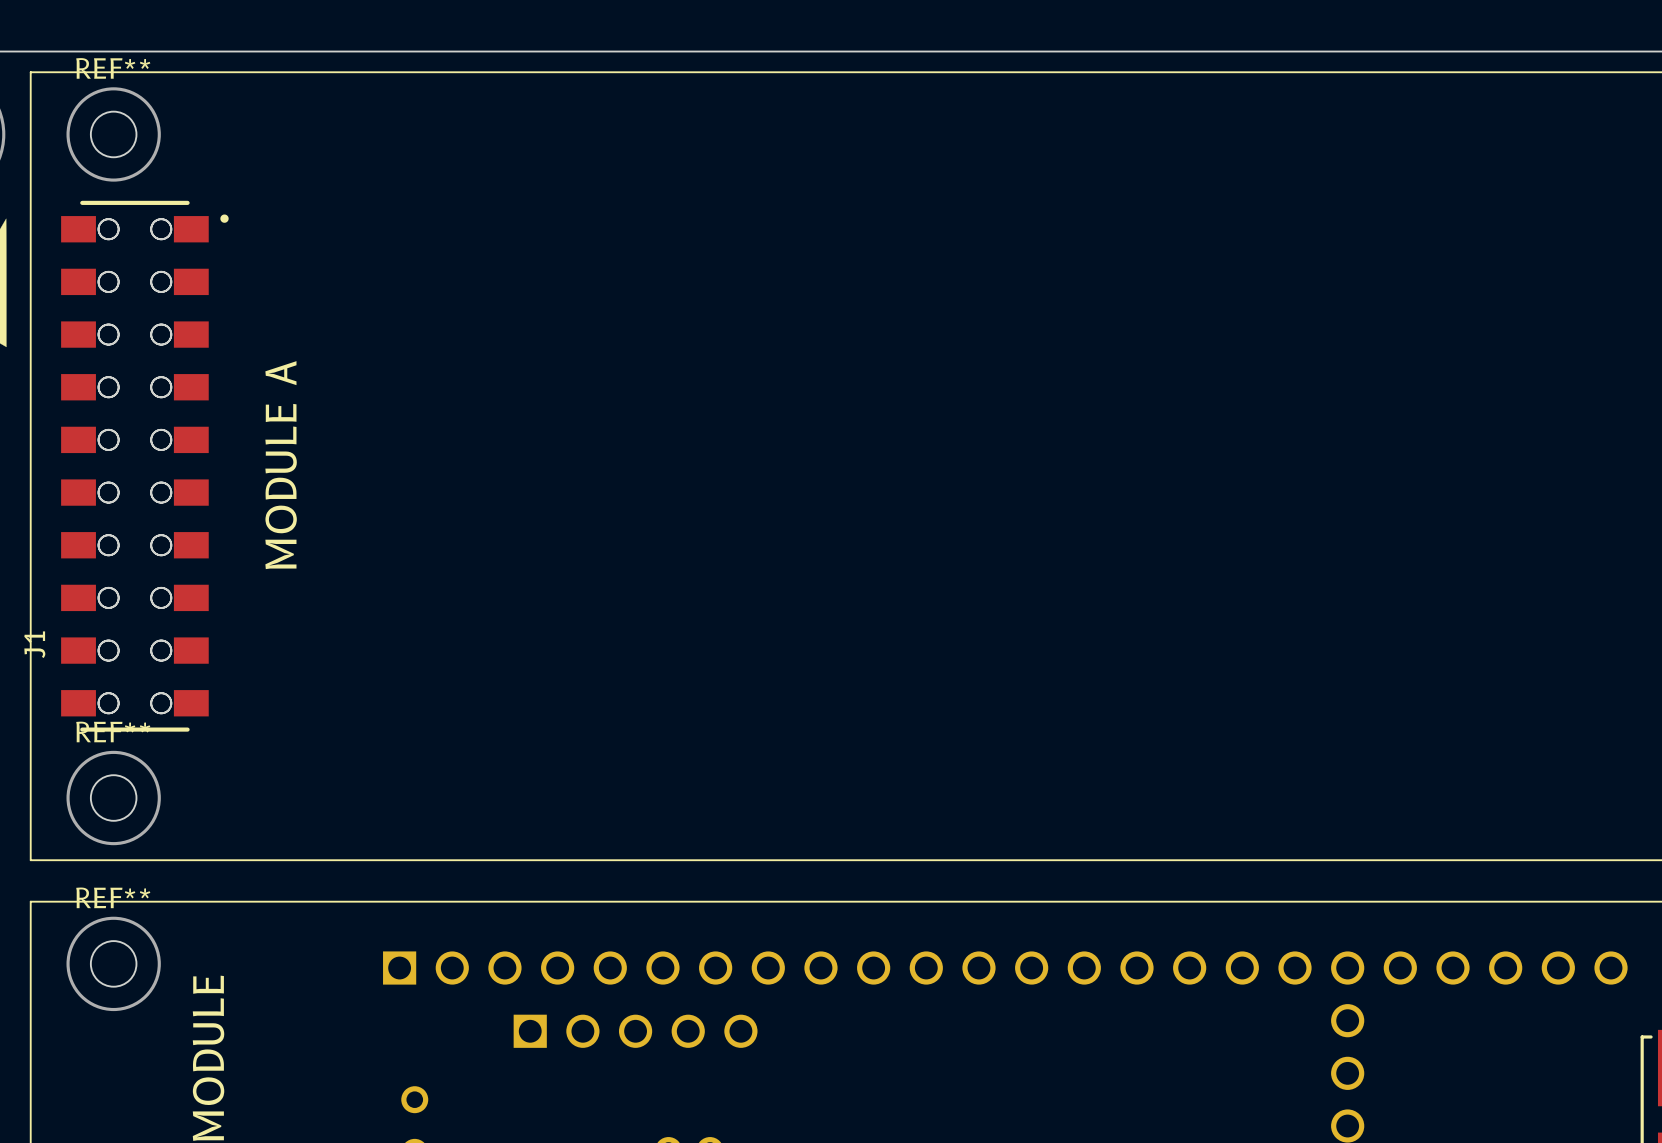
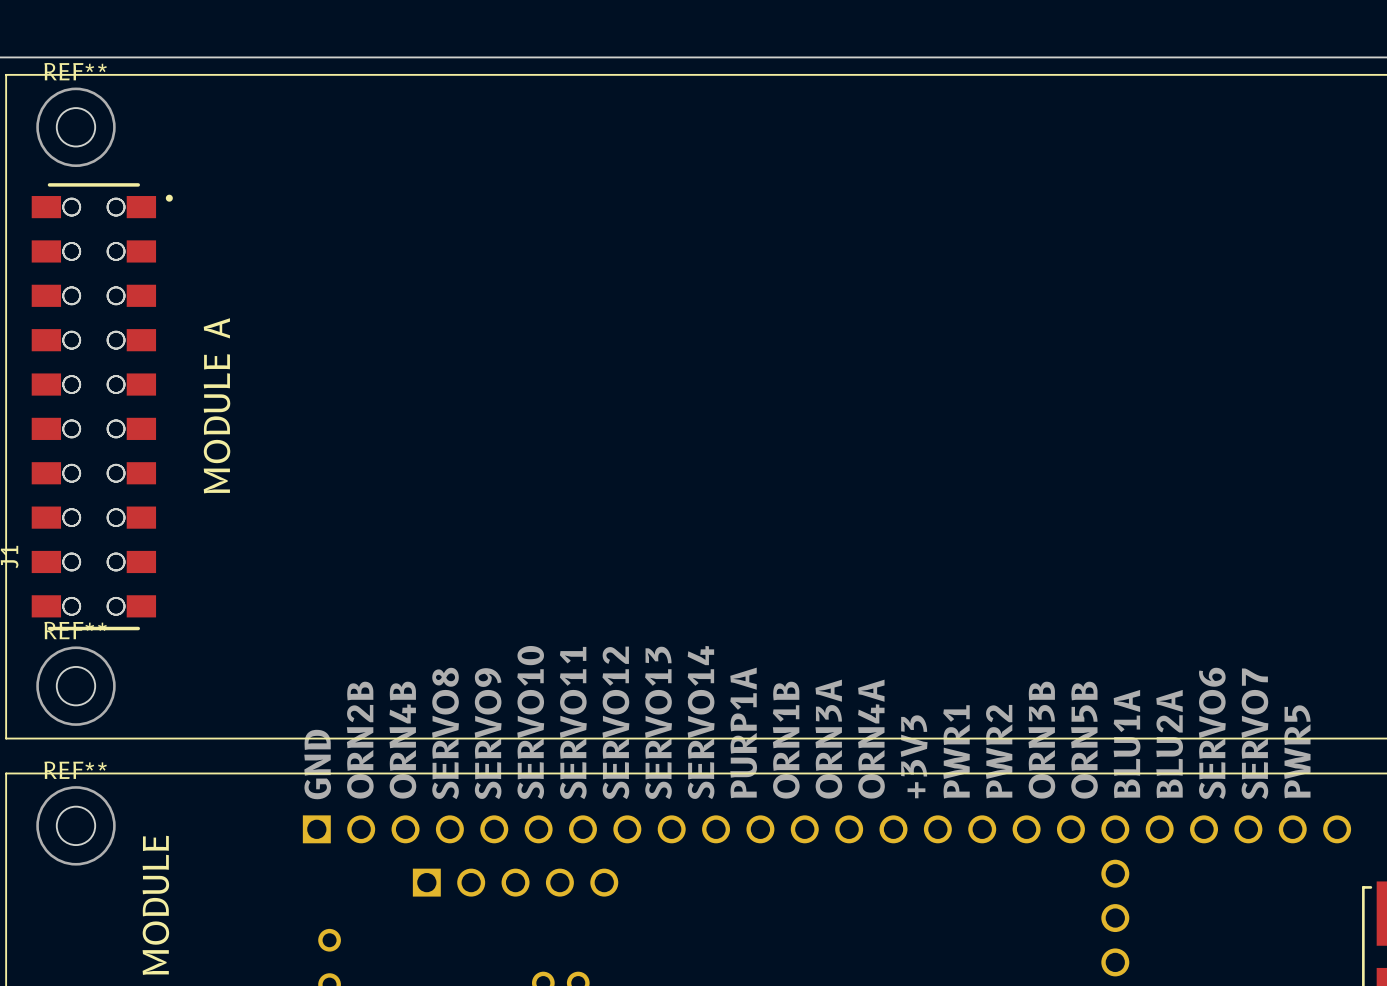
text: none -> SERVO10 (530, 722)
text: none -> SERVO11 (573, 723)
text: none -> SERVO12 (615, 722)
text: none -> SERVO13 (658, 722)
text: none -> SERVO14 (701, 722)
text: none -> PURP1A (743, 732)
text: none -> SERVO8 (445, 733)
text: none -> SERVO9 (488, 733)
text: none -> SERVO6 (1212, 733)
text: none -> SERVO7 (1254, 733)
text: none -> ORN3A (828, 739)
text: none -> ORN4A (871, 739)
text: none -> ORN2B (360, 740)
text: none -> ORN4B (402, 740)
text: none -> ORN1B (786, 740)
text: none -> ORN3B (1041, 740)
text: none -> ORN5B (1084, 740)
text: none -> BLU1A (1127, 744)
text: none -> BLU2A (1169, 744)
text: none -> PWR1 (956, 751)
text: none -> PWR2 (999, 751)
text: none -> PWR5 (1297, 751)
text: none -> +3V3 (914, 756)
text: none -> GND (317, 764)

